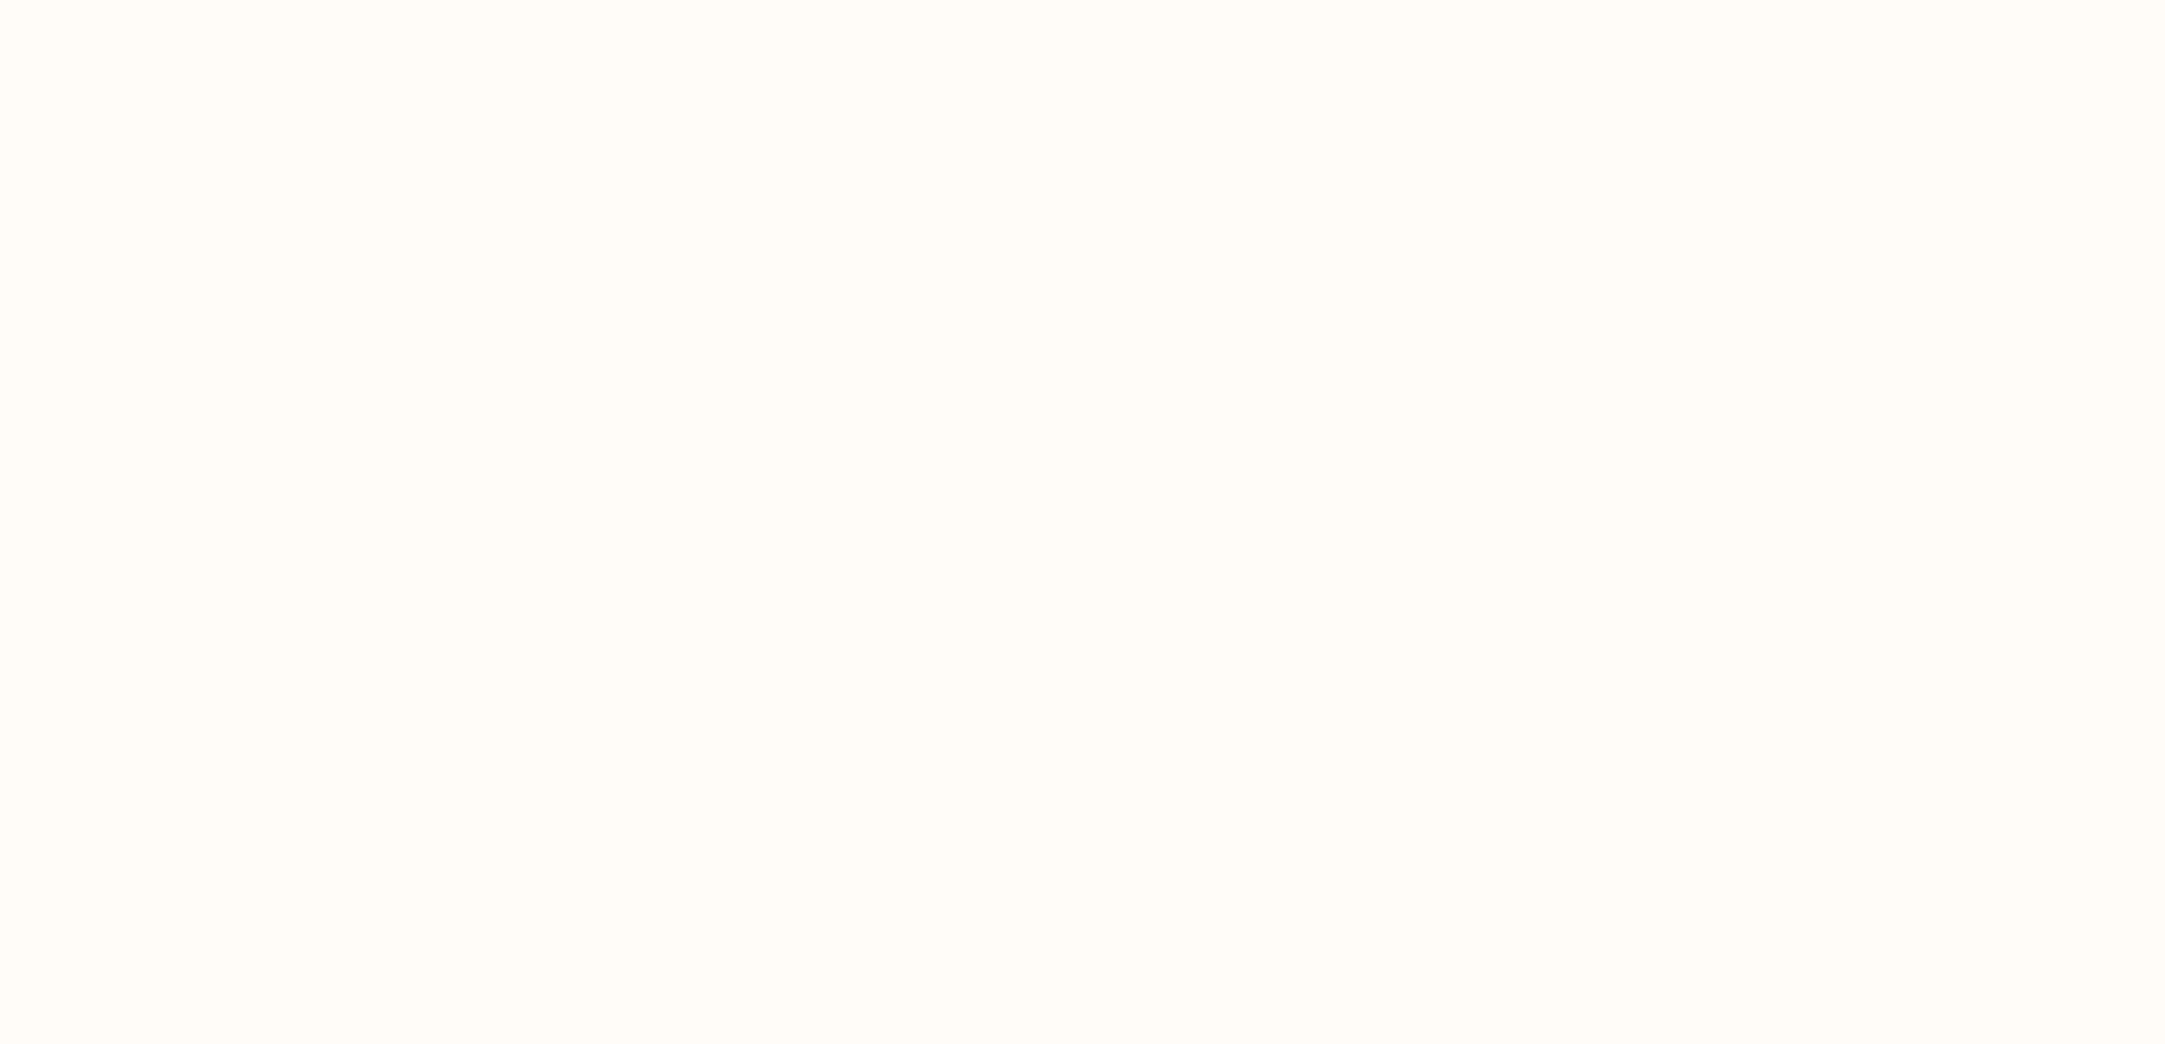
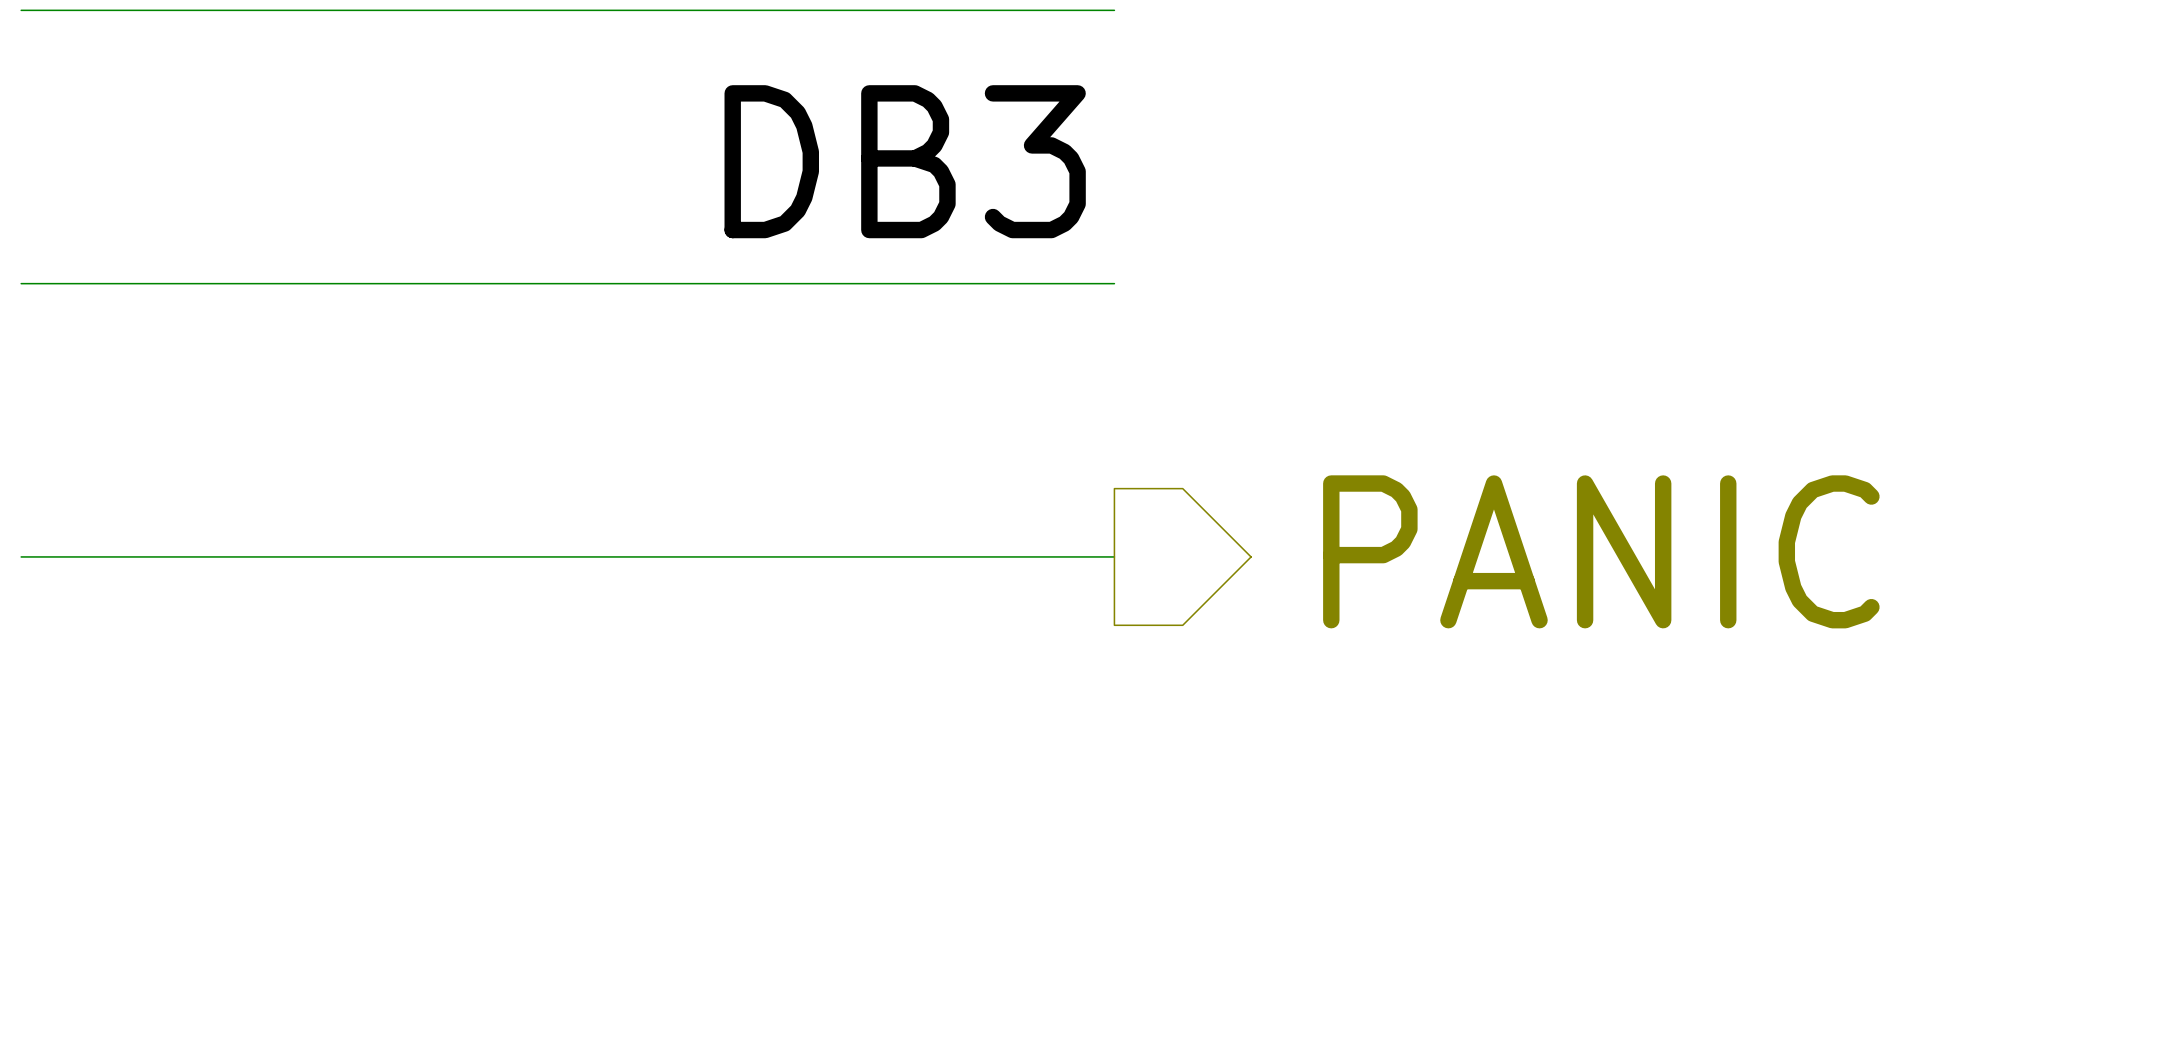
wire: none -> (21, 10) (1114, 10)
label: none -> DB3 (905, 161)
wire: none -> (21, 283) (1114, 283)
hierarchical label: none -> PANIC (1601, 551)
wire: none -> (21, 556) (1114, 556)

